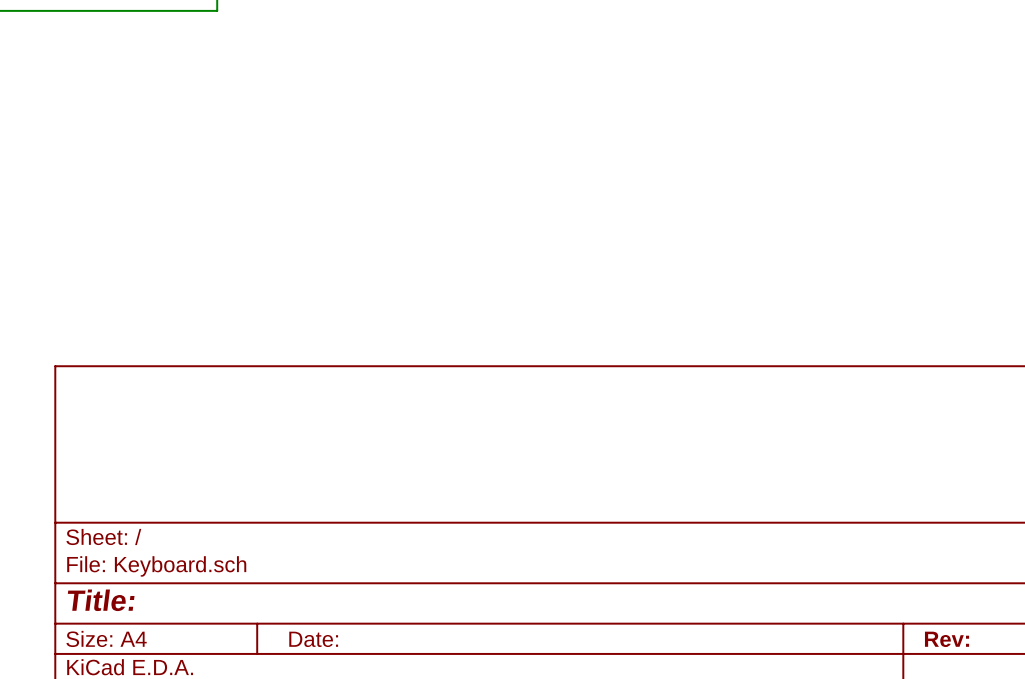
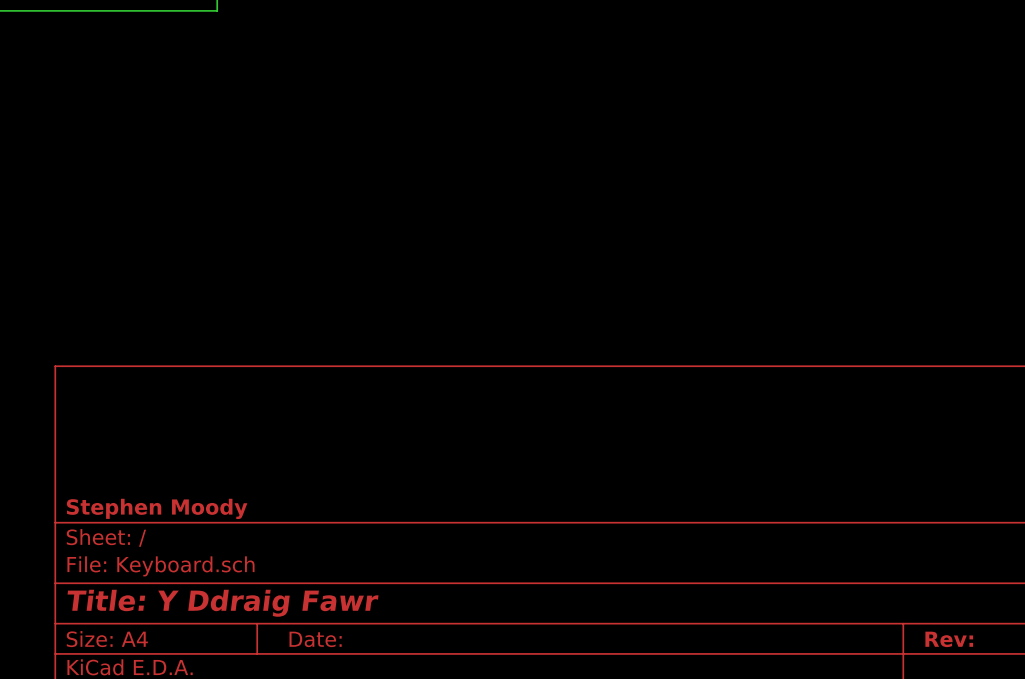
title block: none -> Stephen Moody (157, 508)
title block: Title: (101, 600) -> Title: Y Ddraig Fawr (223, 603)

